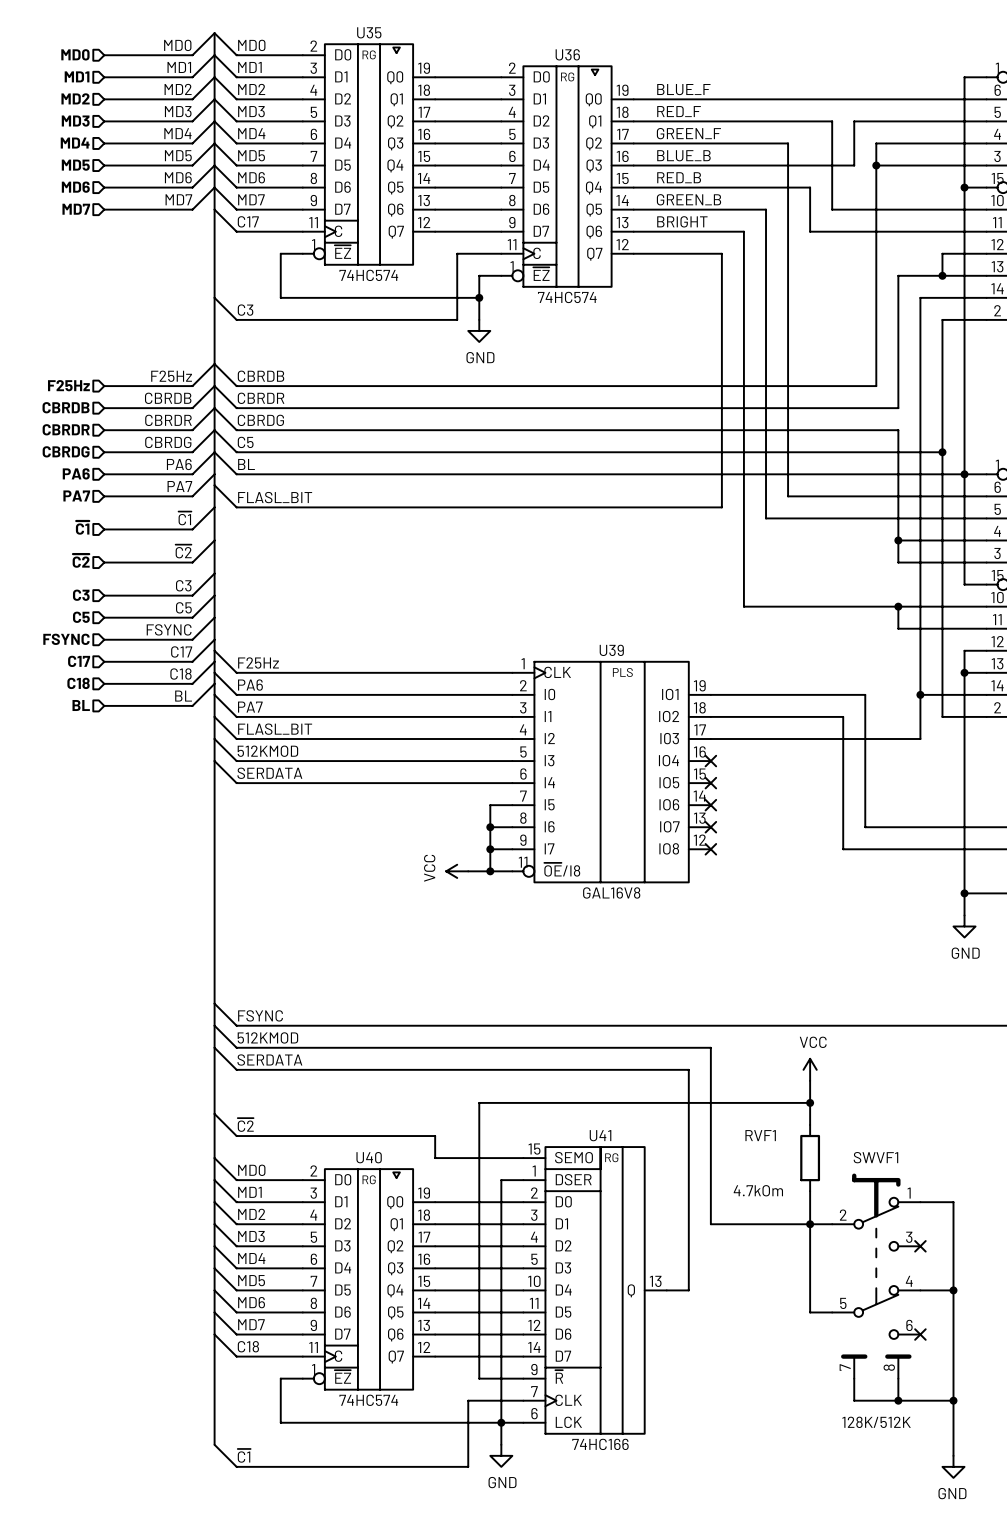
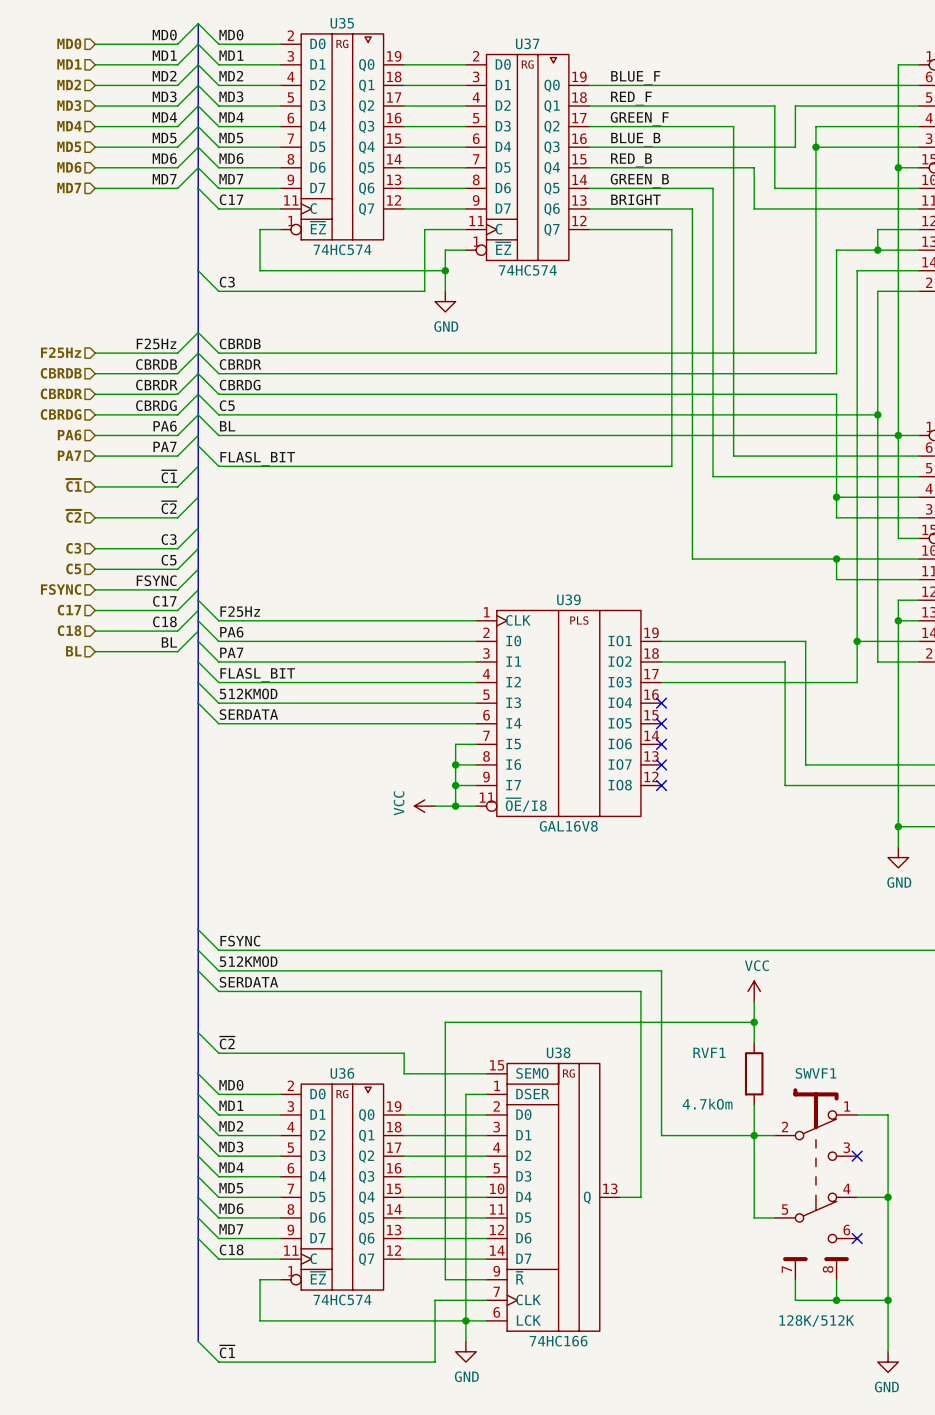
U36 name: U36 (567, 54) -> U37 (527, 43)
U41 name: U41 (600, 1135) -> U38 (558, 1052)
U40 name: U40 (369, 1157) -> U36 (342, 1073)

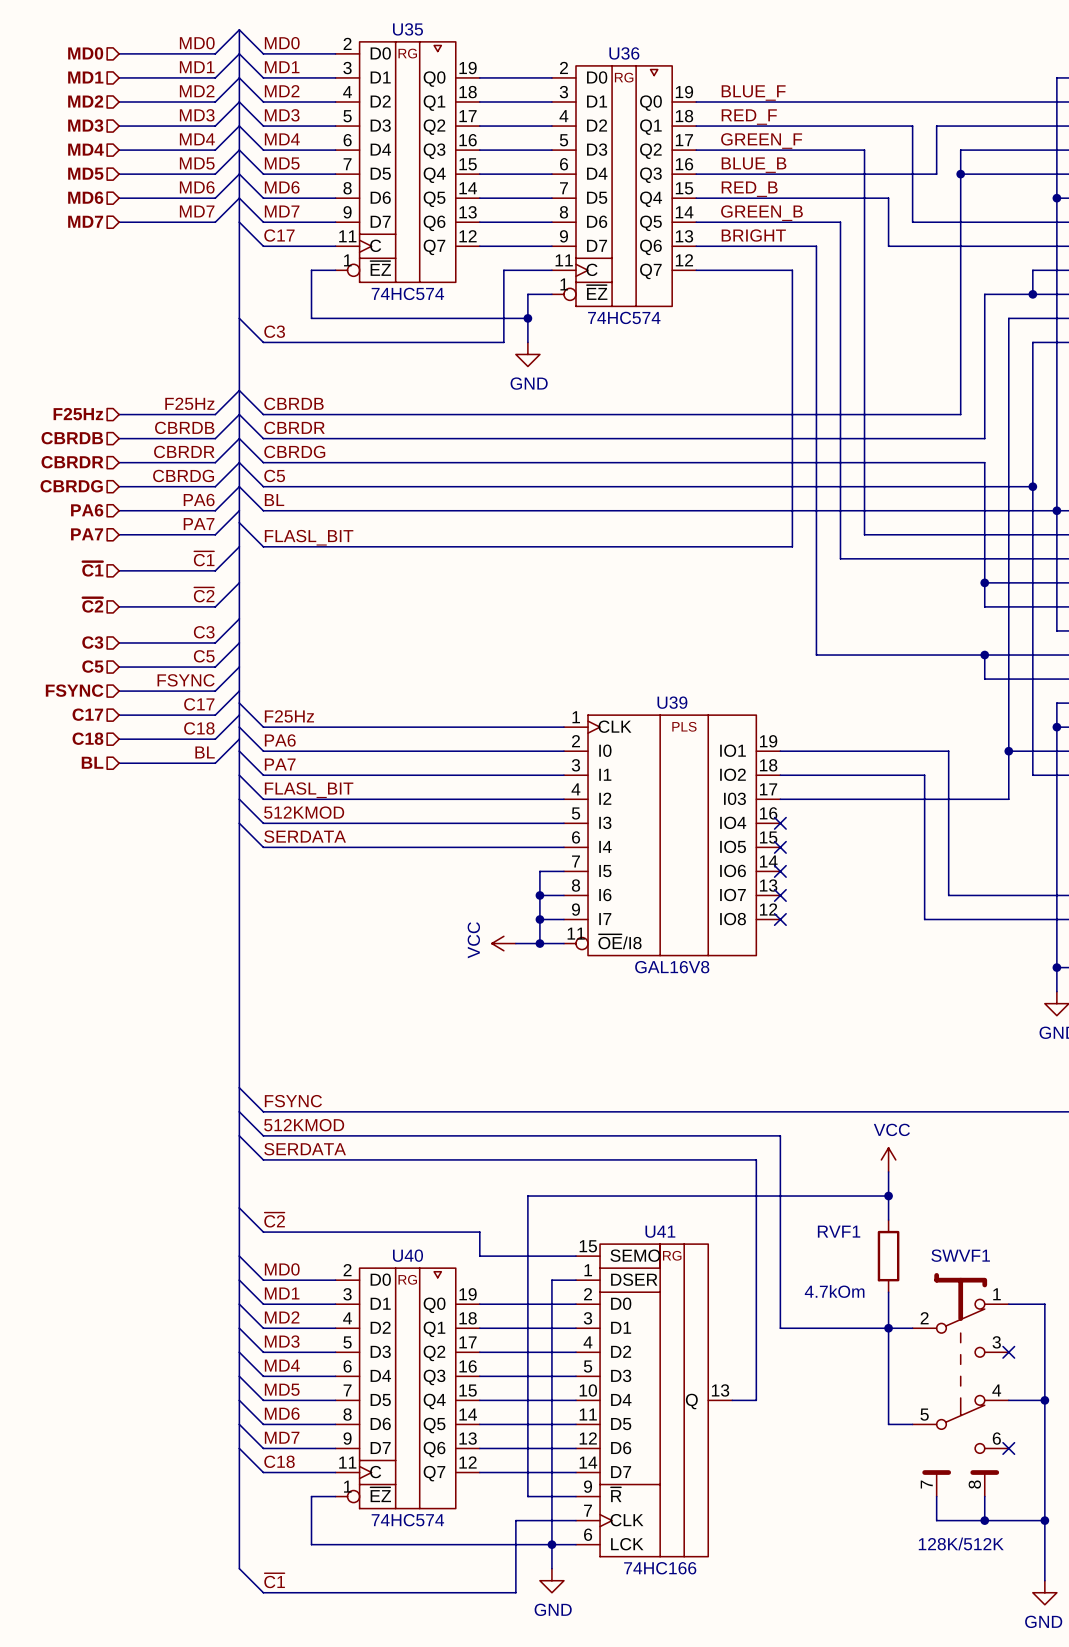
U37 name: U37 (527, 43) -> U36 (624, 53)
U38 name: U38 (558, 1052) -> U41 (660, 1231)
U36 name: U36 (342, 1073) -> U40 (408, 1255)

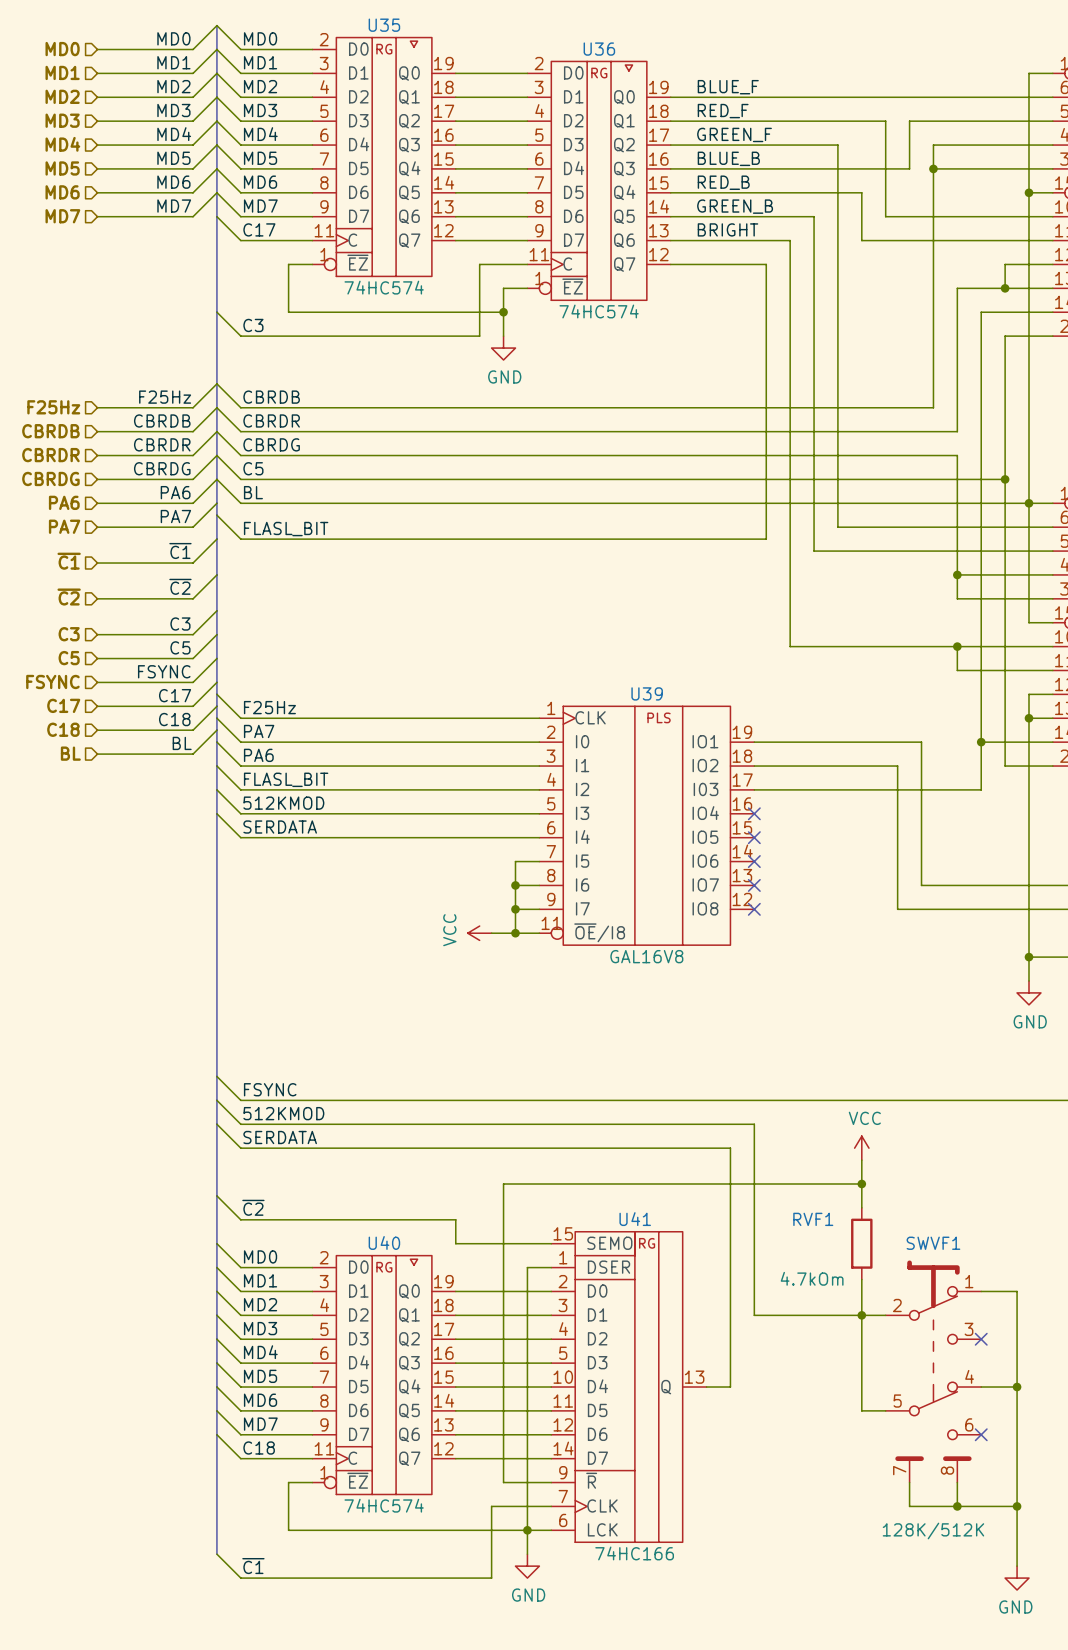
label: PA6 (280, 740) -> PA7 (259, 731)
label: PA7 (280, 764) -> PA6 (258, 755)

